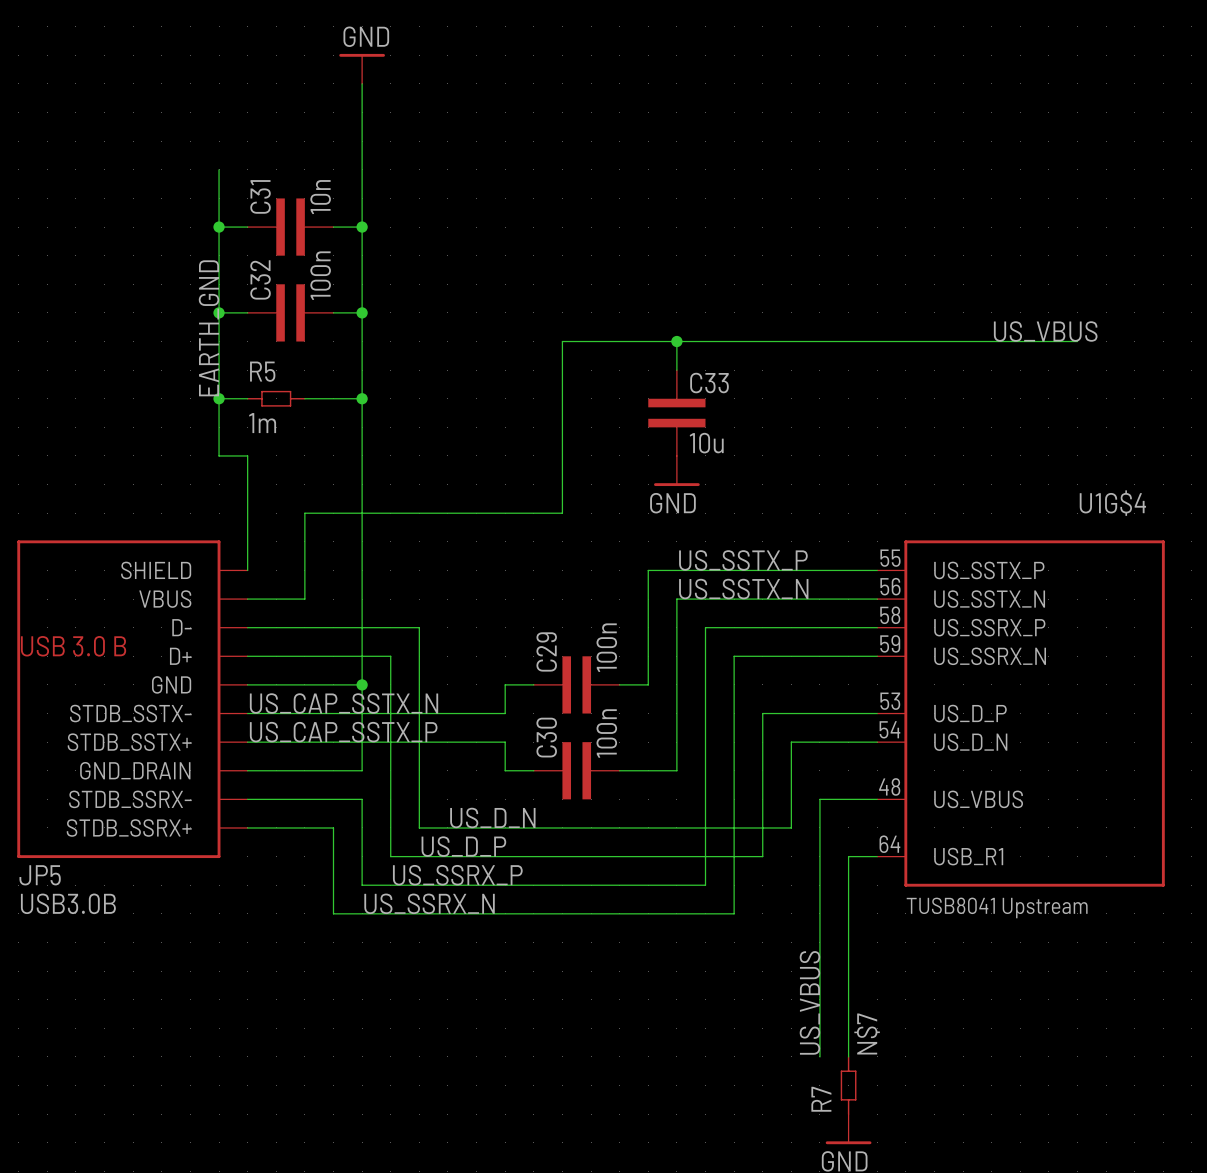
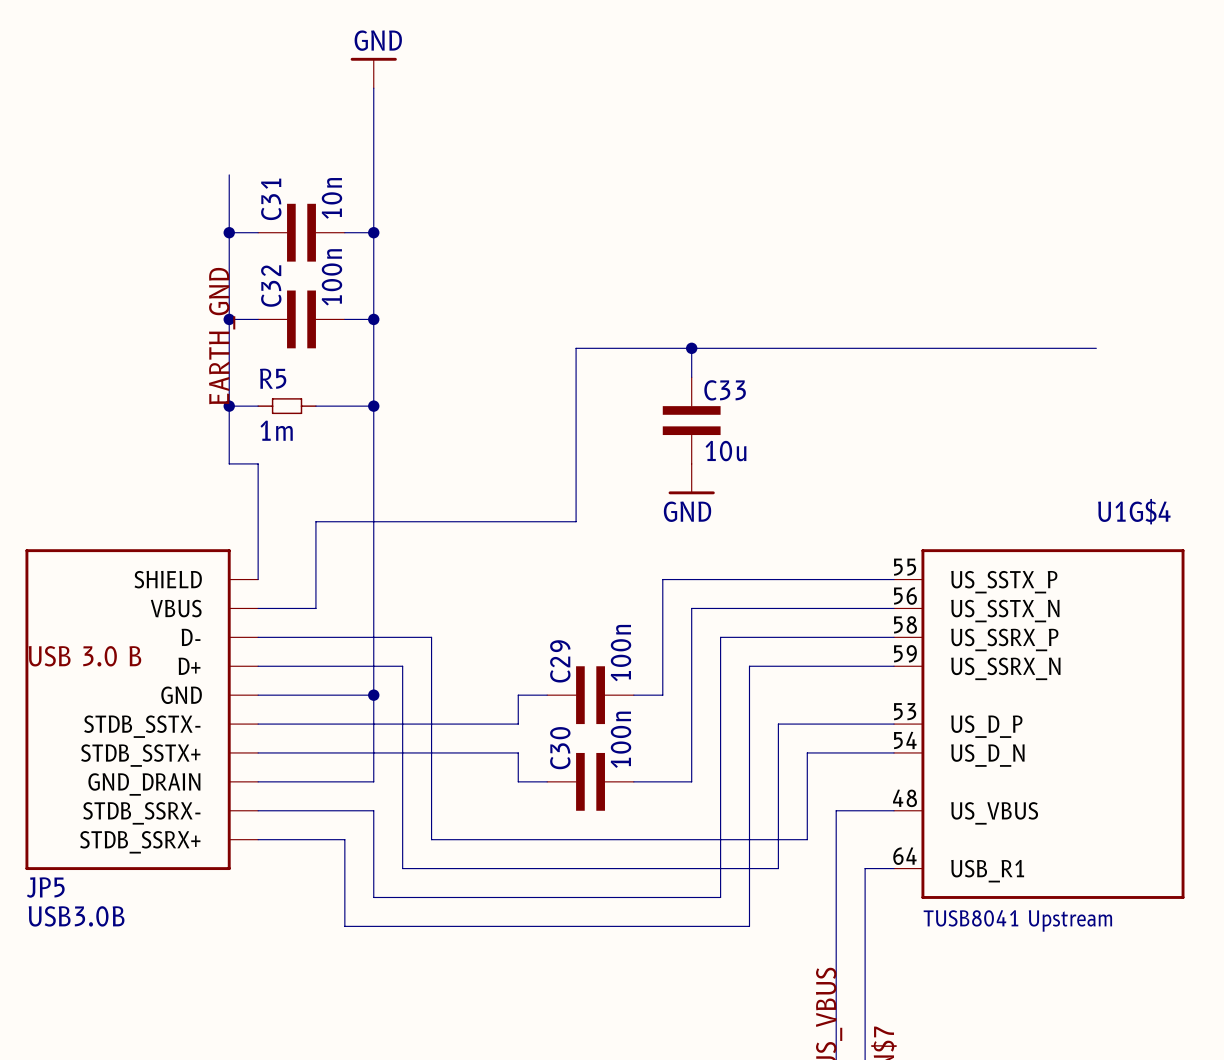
label: US_VBUS (1045, 331) -> none
label: US_SSTX_P (743, 560) -> none
label: US_SSTX_N (743, 589) -> none
label: US_CAP_SSTX_N (344, 703) -> none
label: US_CAP_SSTX_P (343, 732) -> none
label: US_D_N (492, 817) -> none
label: US_D_P (463, 846) -> none
label: US_SSRX_P (457, 875) -> none
label: US_SSRX_N (429, 903) -> none

